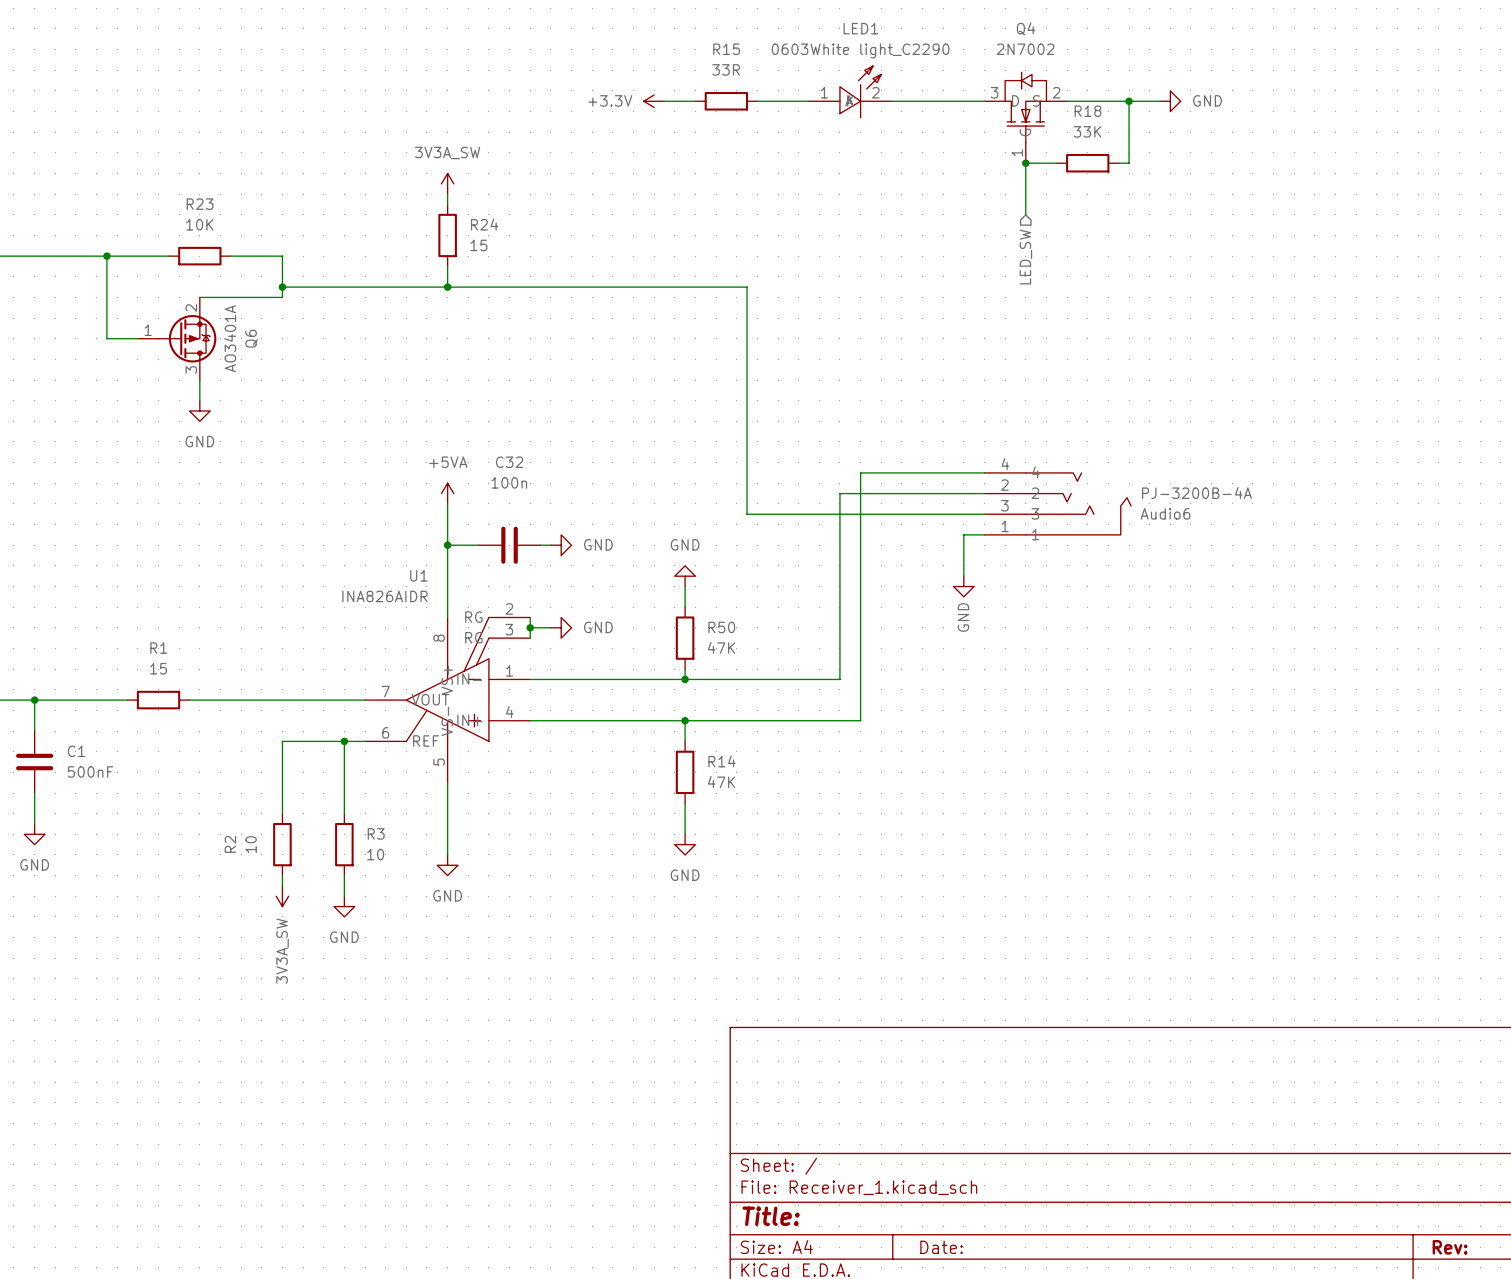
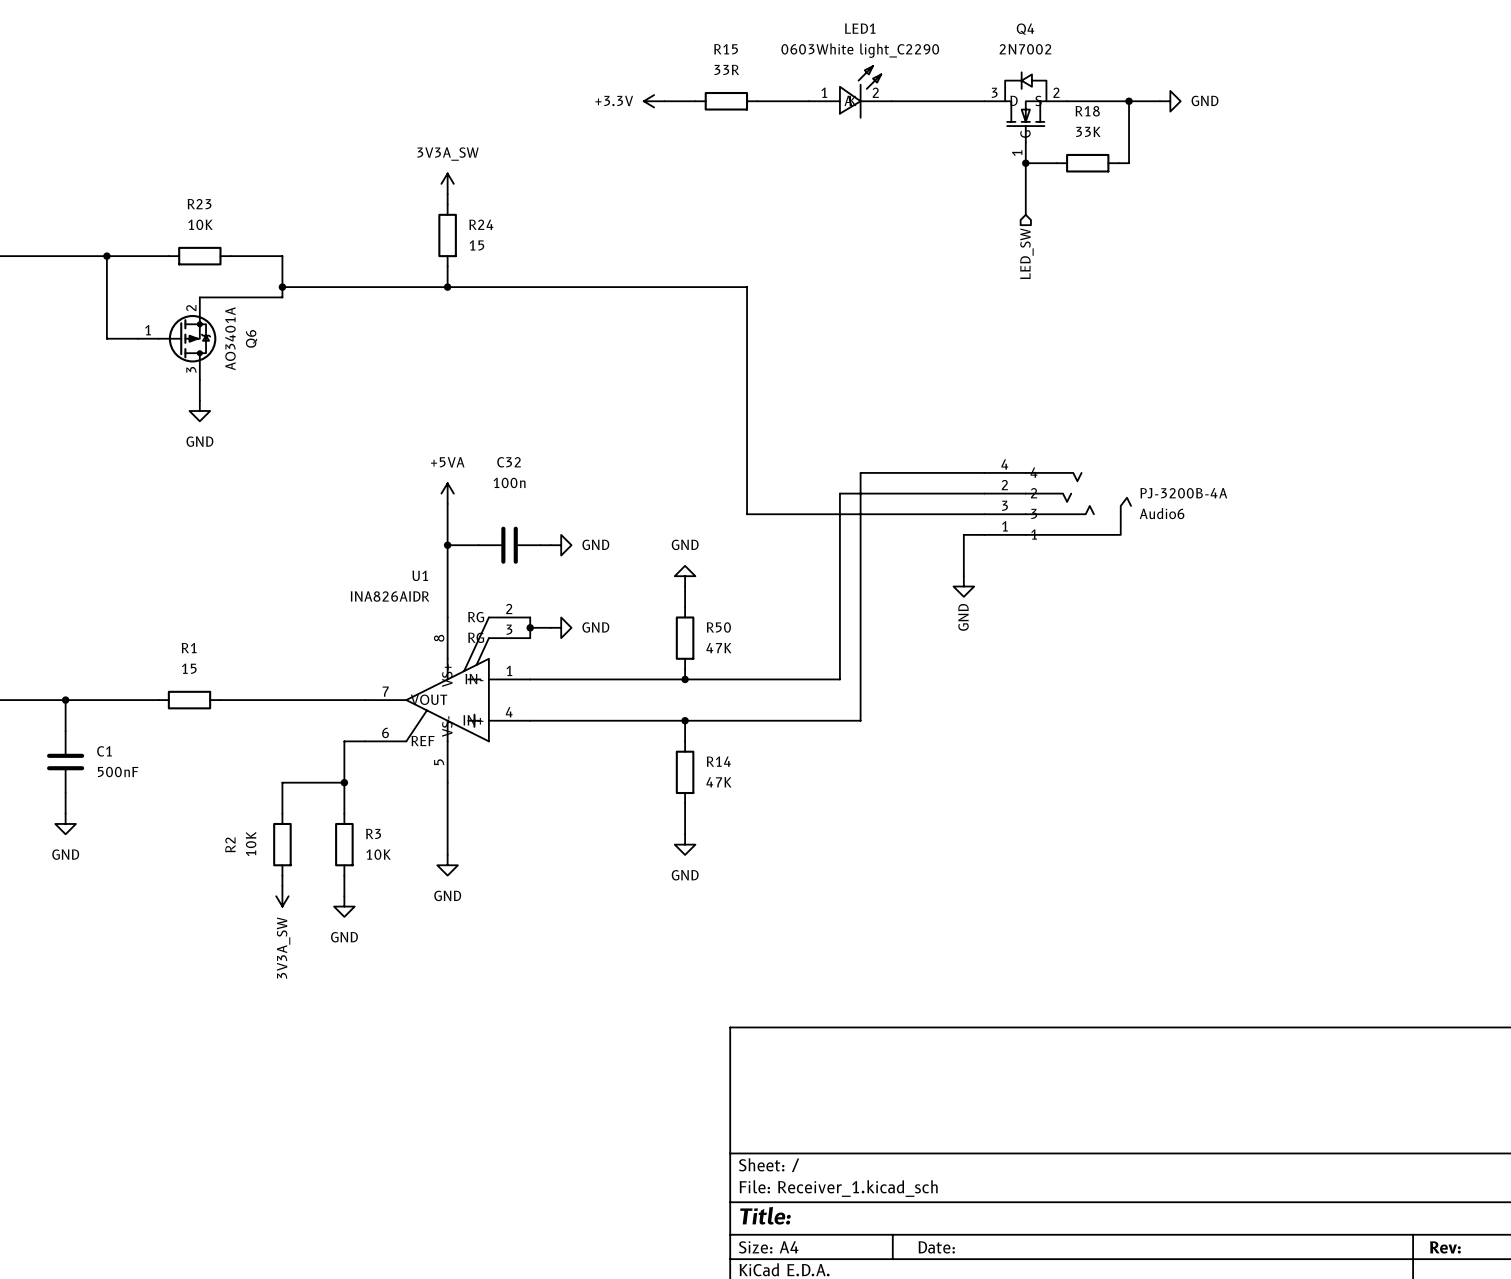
wire: (34, 700) (34, 731) -> (65, 700) (65, 731)
junction position: (34, 700) -> (65, 700)
R1 position: (158, 700) -> (189, 700)
wire: (189, 700) (220, 700) -> (127, 700) (158, 700)
wire: (344, 741) (282, 741) (282, 782) -> (344, 782) (282, 782)
junction position: (344, 741) -> (344, 782)
C1 position: (34, 762) -> (65, 762)
wire: (34, 793) (34, 823) -> none
wire: none -> (65, 793) (65, 813)
power symbol position: GND (34, 834) -> GND (65, 823)
R2 value: 10 (251, 844) -> 10K (251, 843)
R3 value: 10 (375, 854) -> 10K (378, 854)

